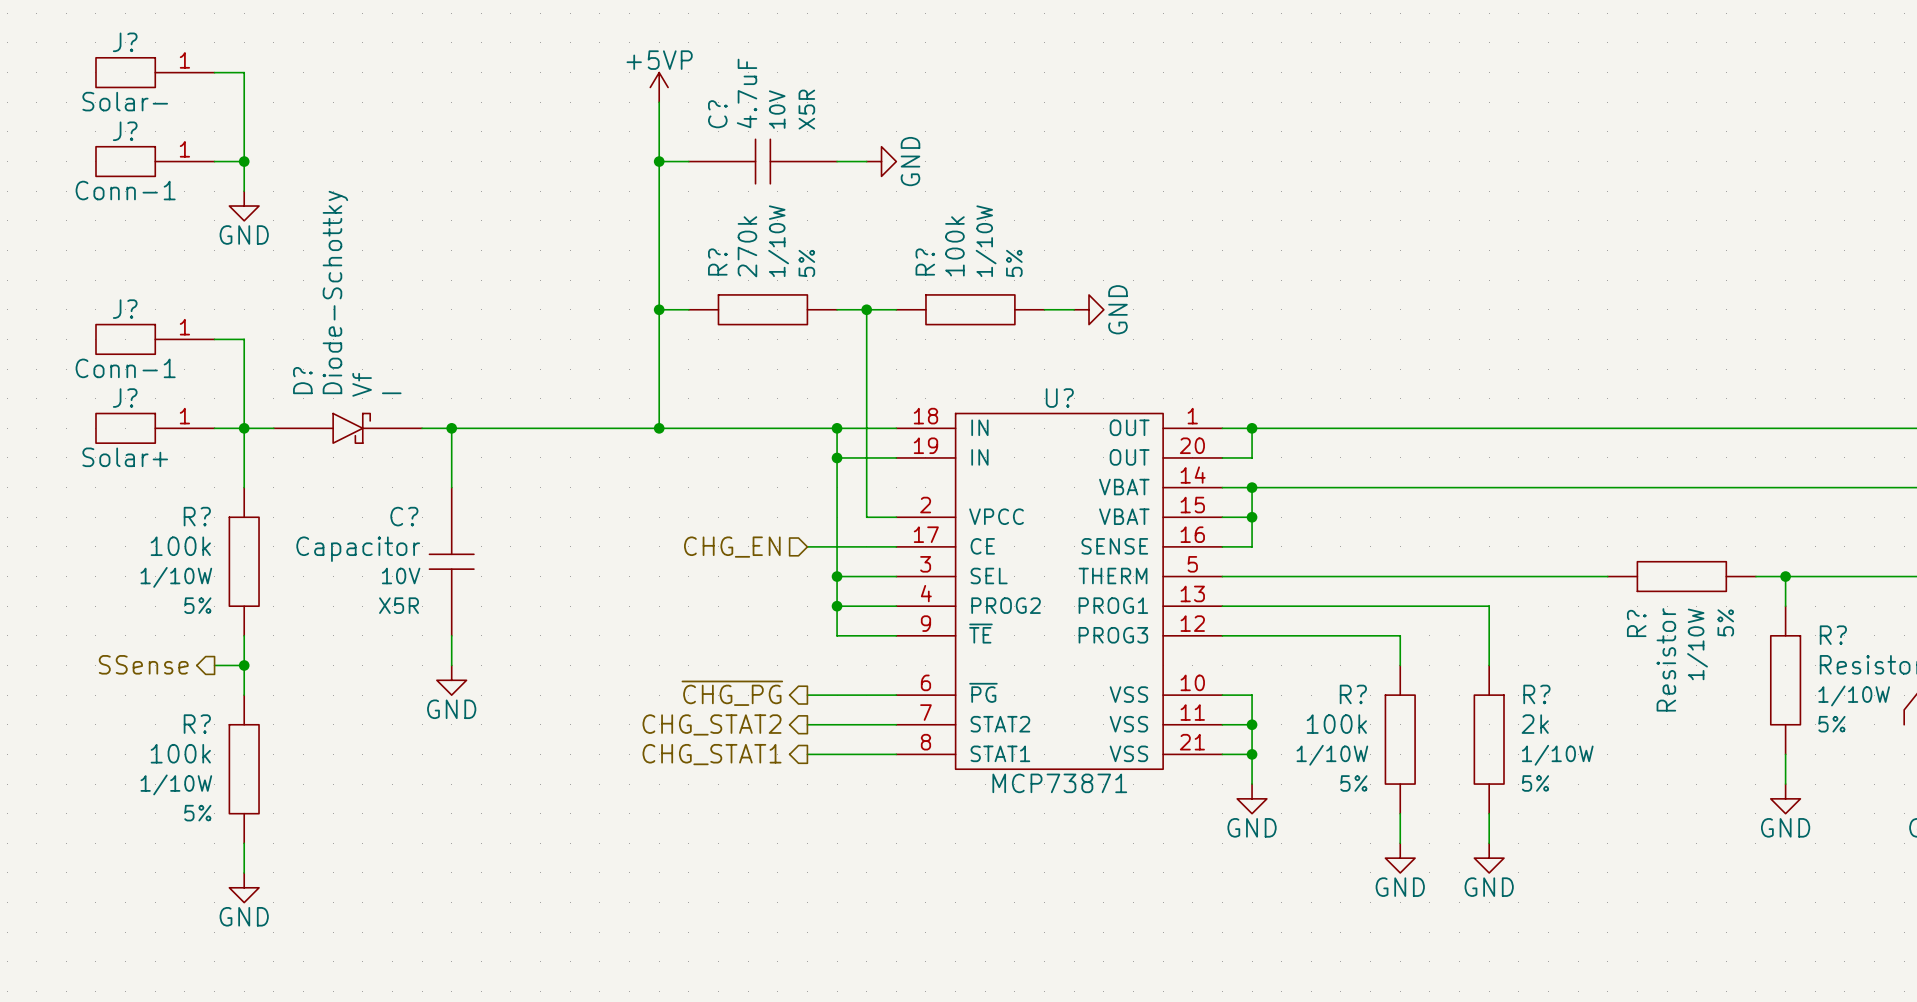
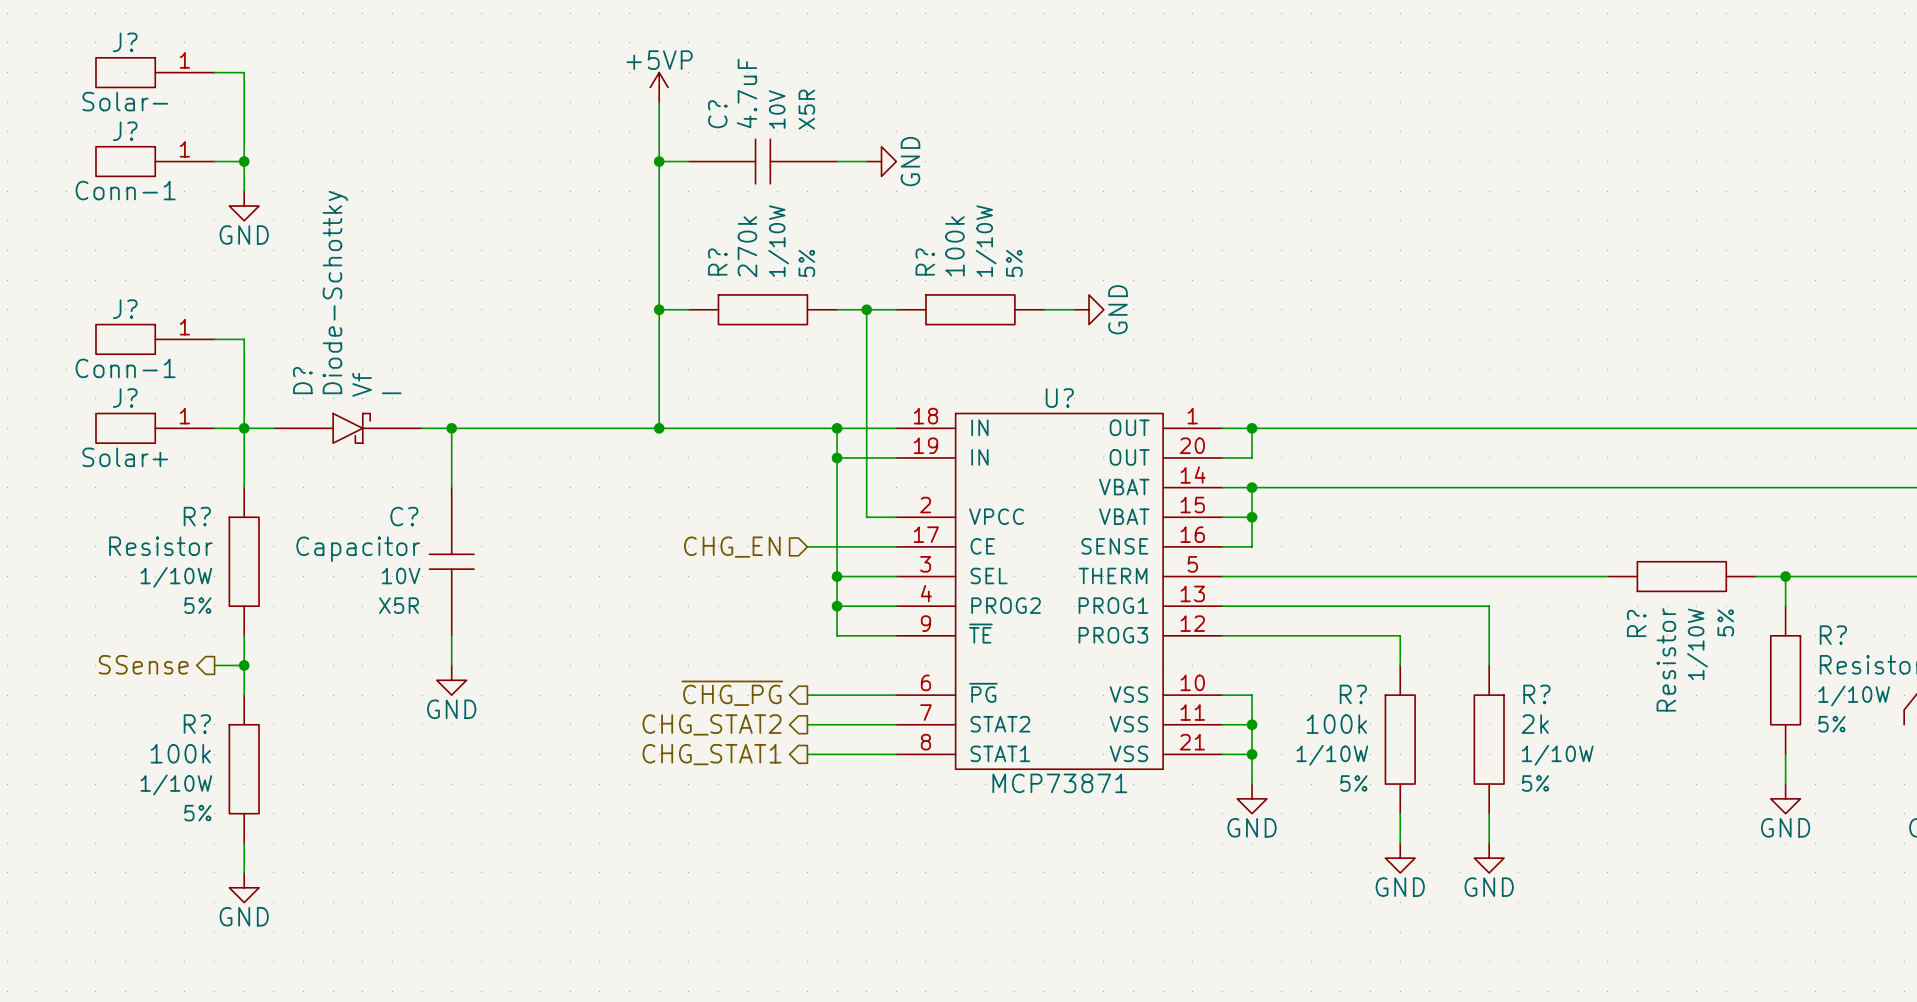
R? value: 100k (180, 546) -> Resistor (160, 546)

